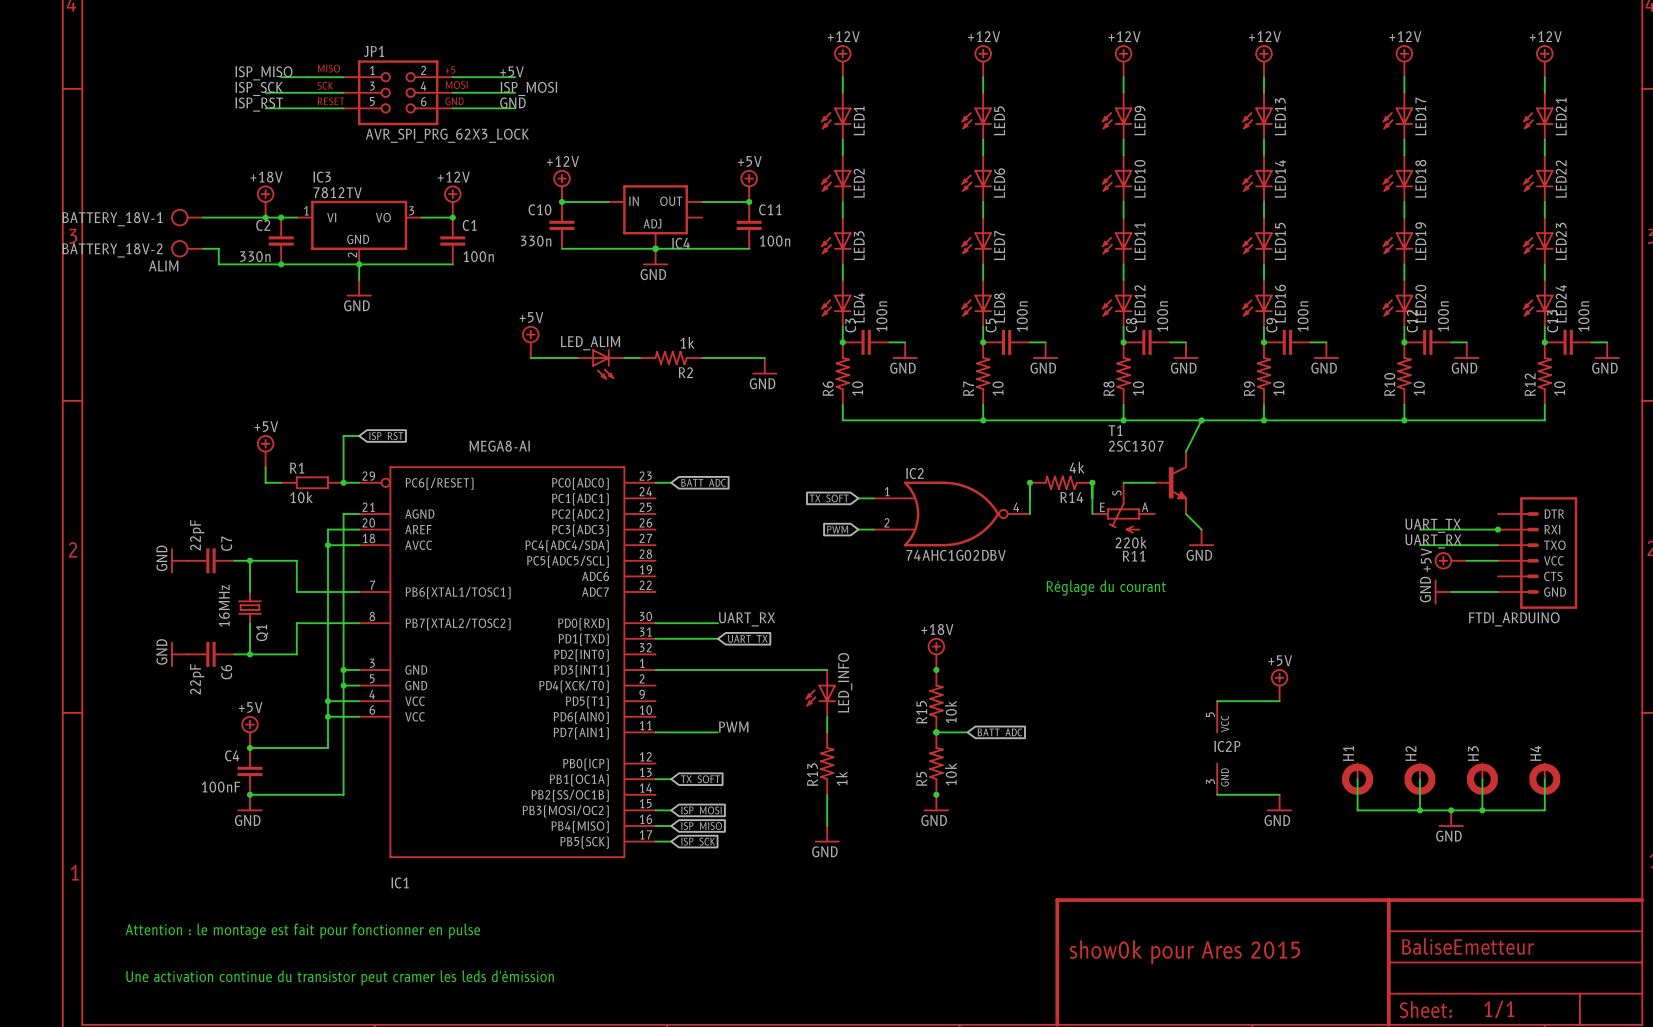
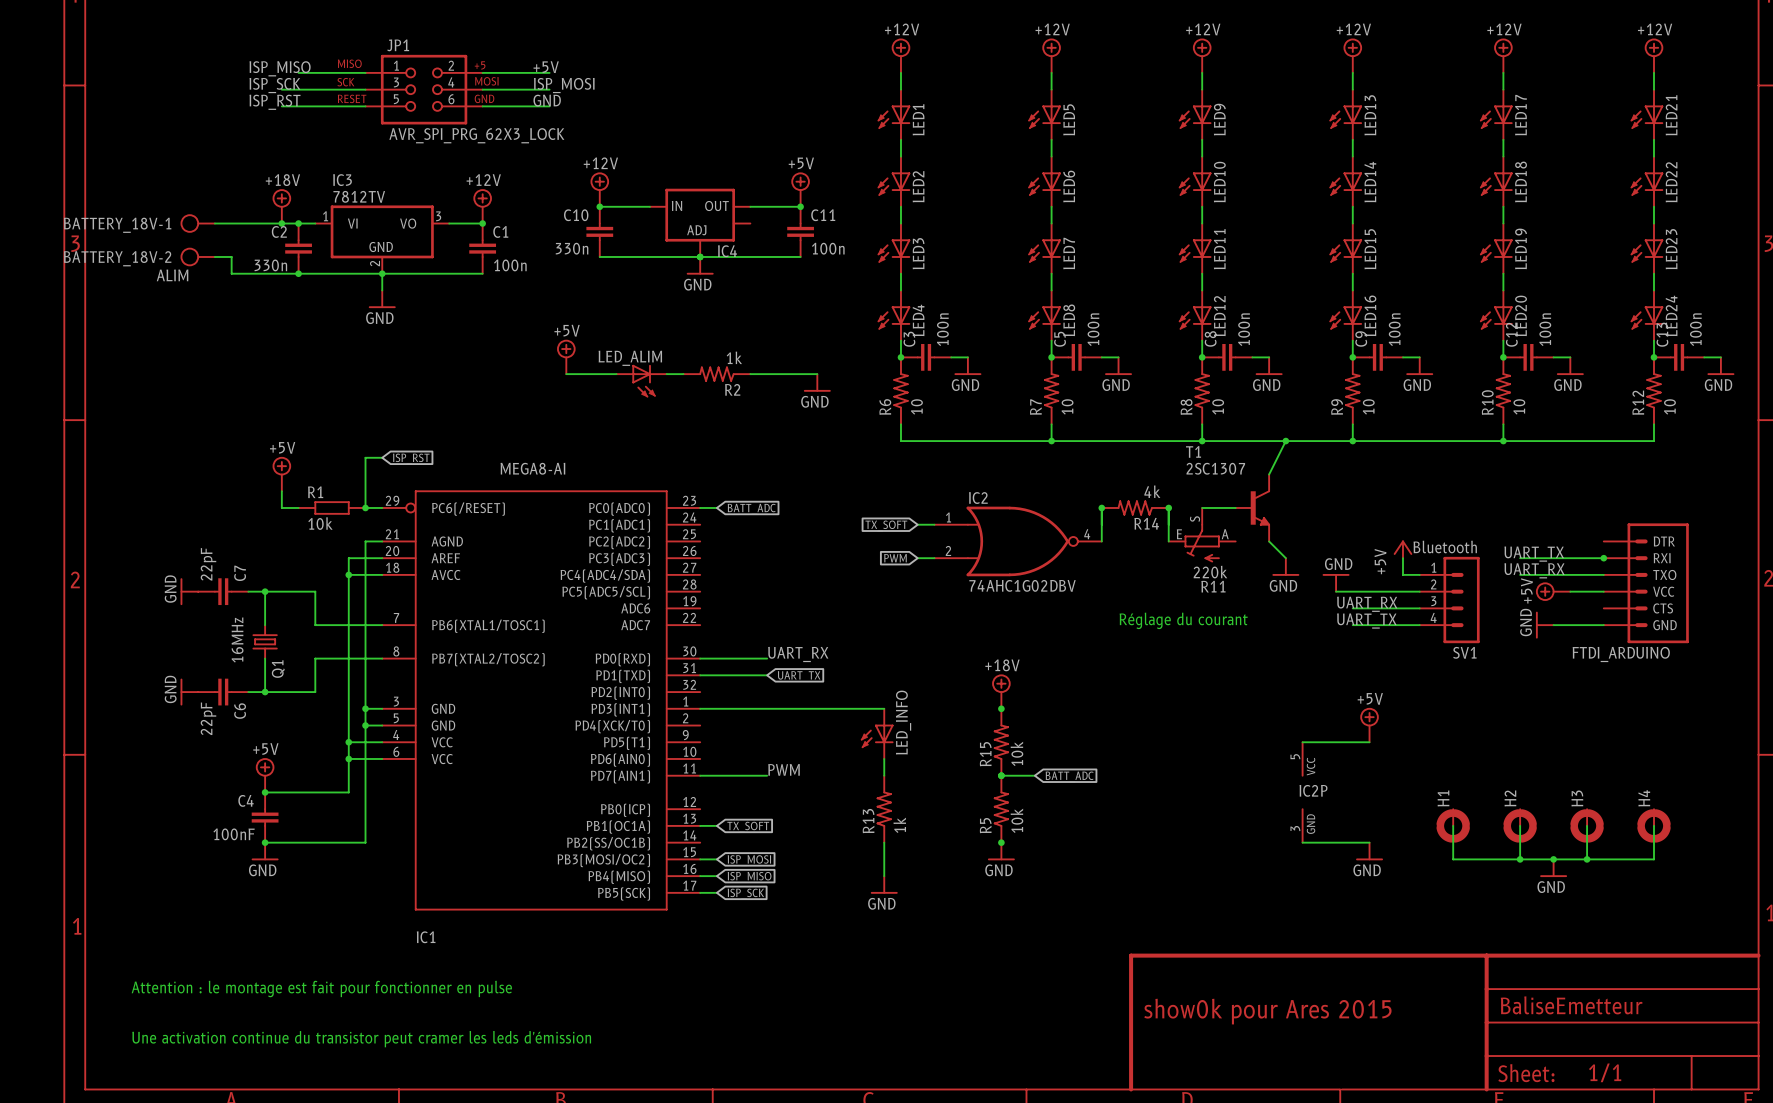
power symbol: none -> +5V (1402, 549)
wire: none -> (1402, 558) (1402, 574) (1419, 574)
power symbol: none -> GND (1336, 582)
wire: none -> (1336, 591) (1419, 591)
SV1: none -> Bluetooth (1449, 600)
label: none -> UART_RX (1367, 604)
wire: none -> (1352, 608) (1419, 608)
label: none -> UART_TX (1366, 621)
wire: none -> (1352, 625) (1419, 625)

